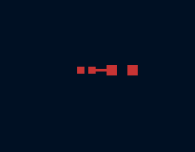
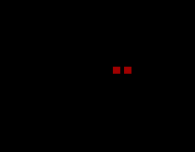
part footprint: [106, 65, 138, 76] -> [112, 66, 132, 74]
part: (86, 70) -> none
top track: (111, 70) (91, 70) -> none

